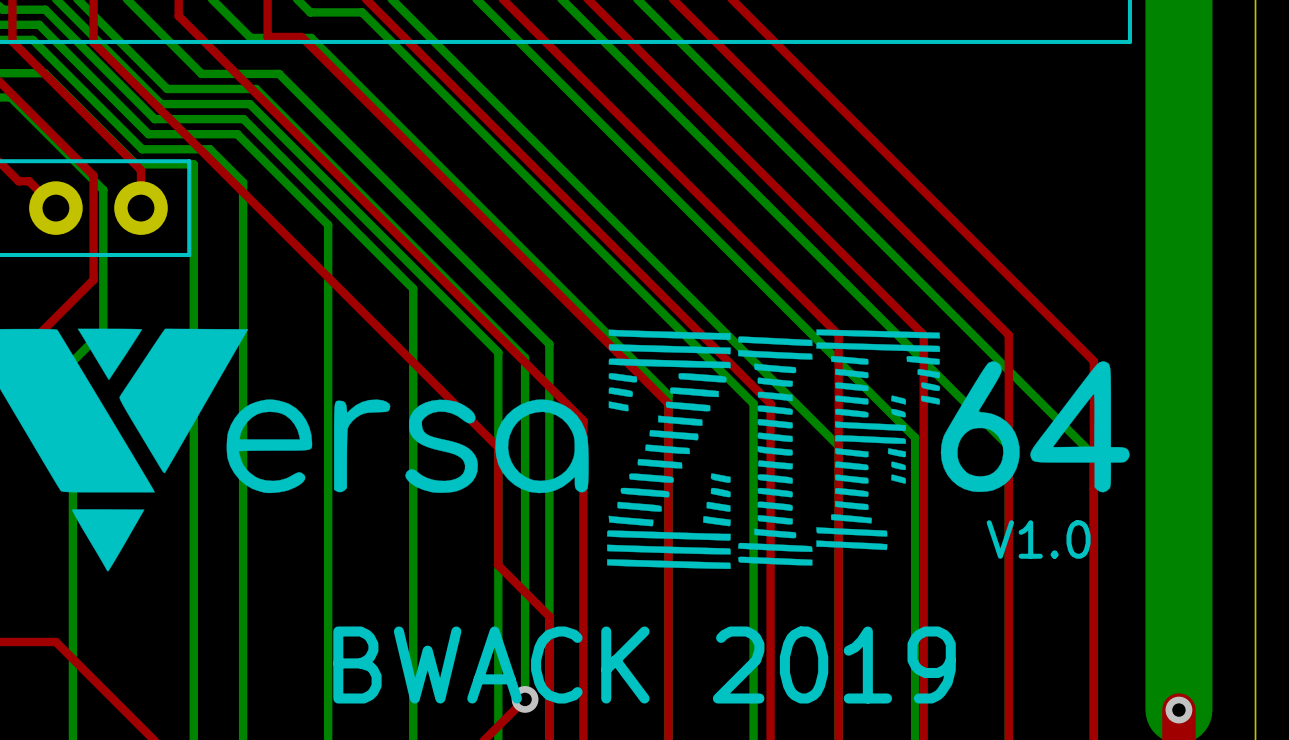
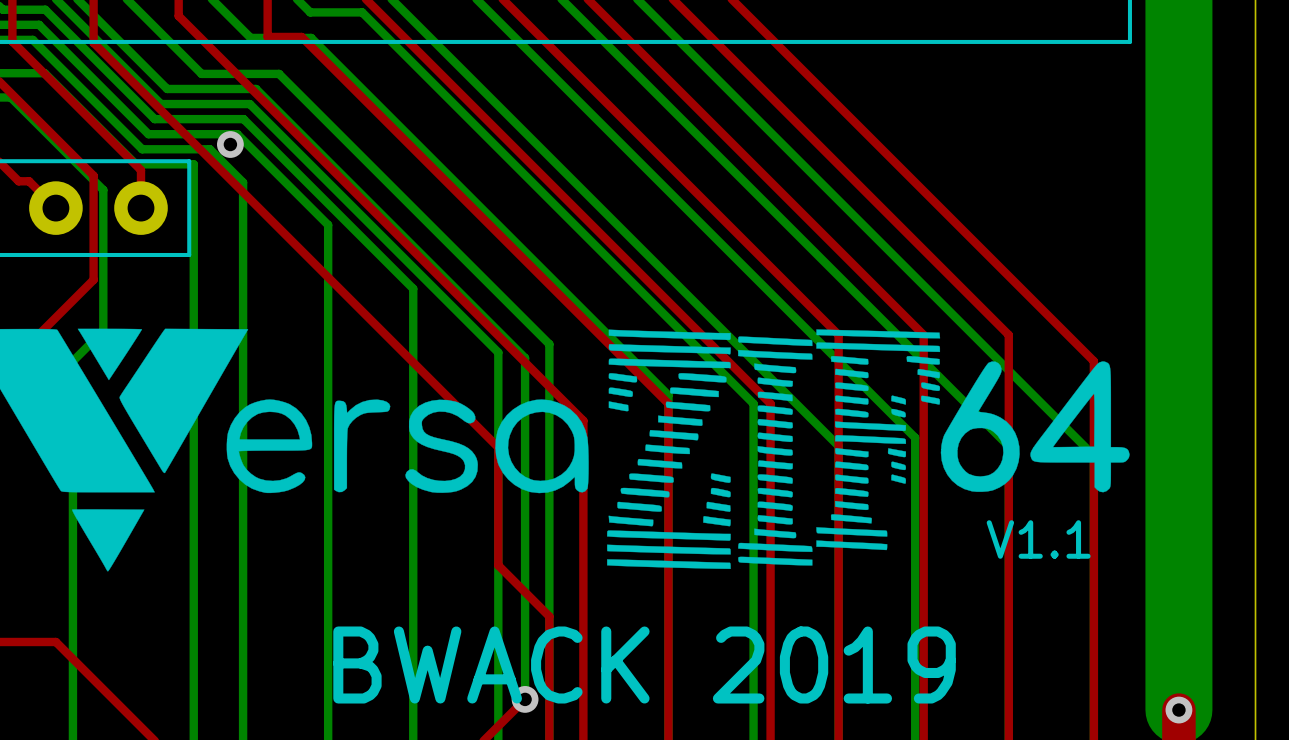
via: none -> (230, 144)
text: V1.0 (1038, 539) -> V1.1 (1038, 539)

